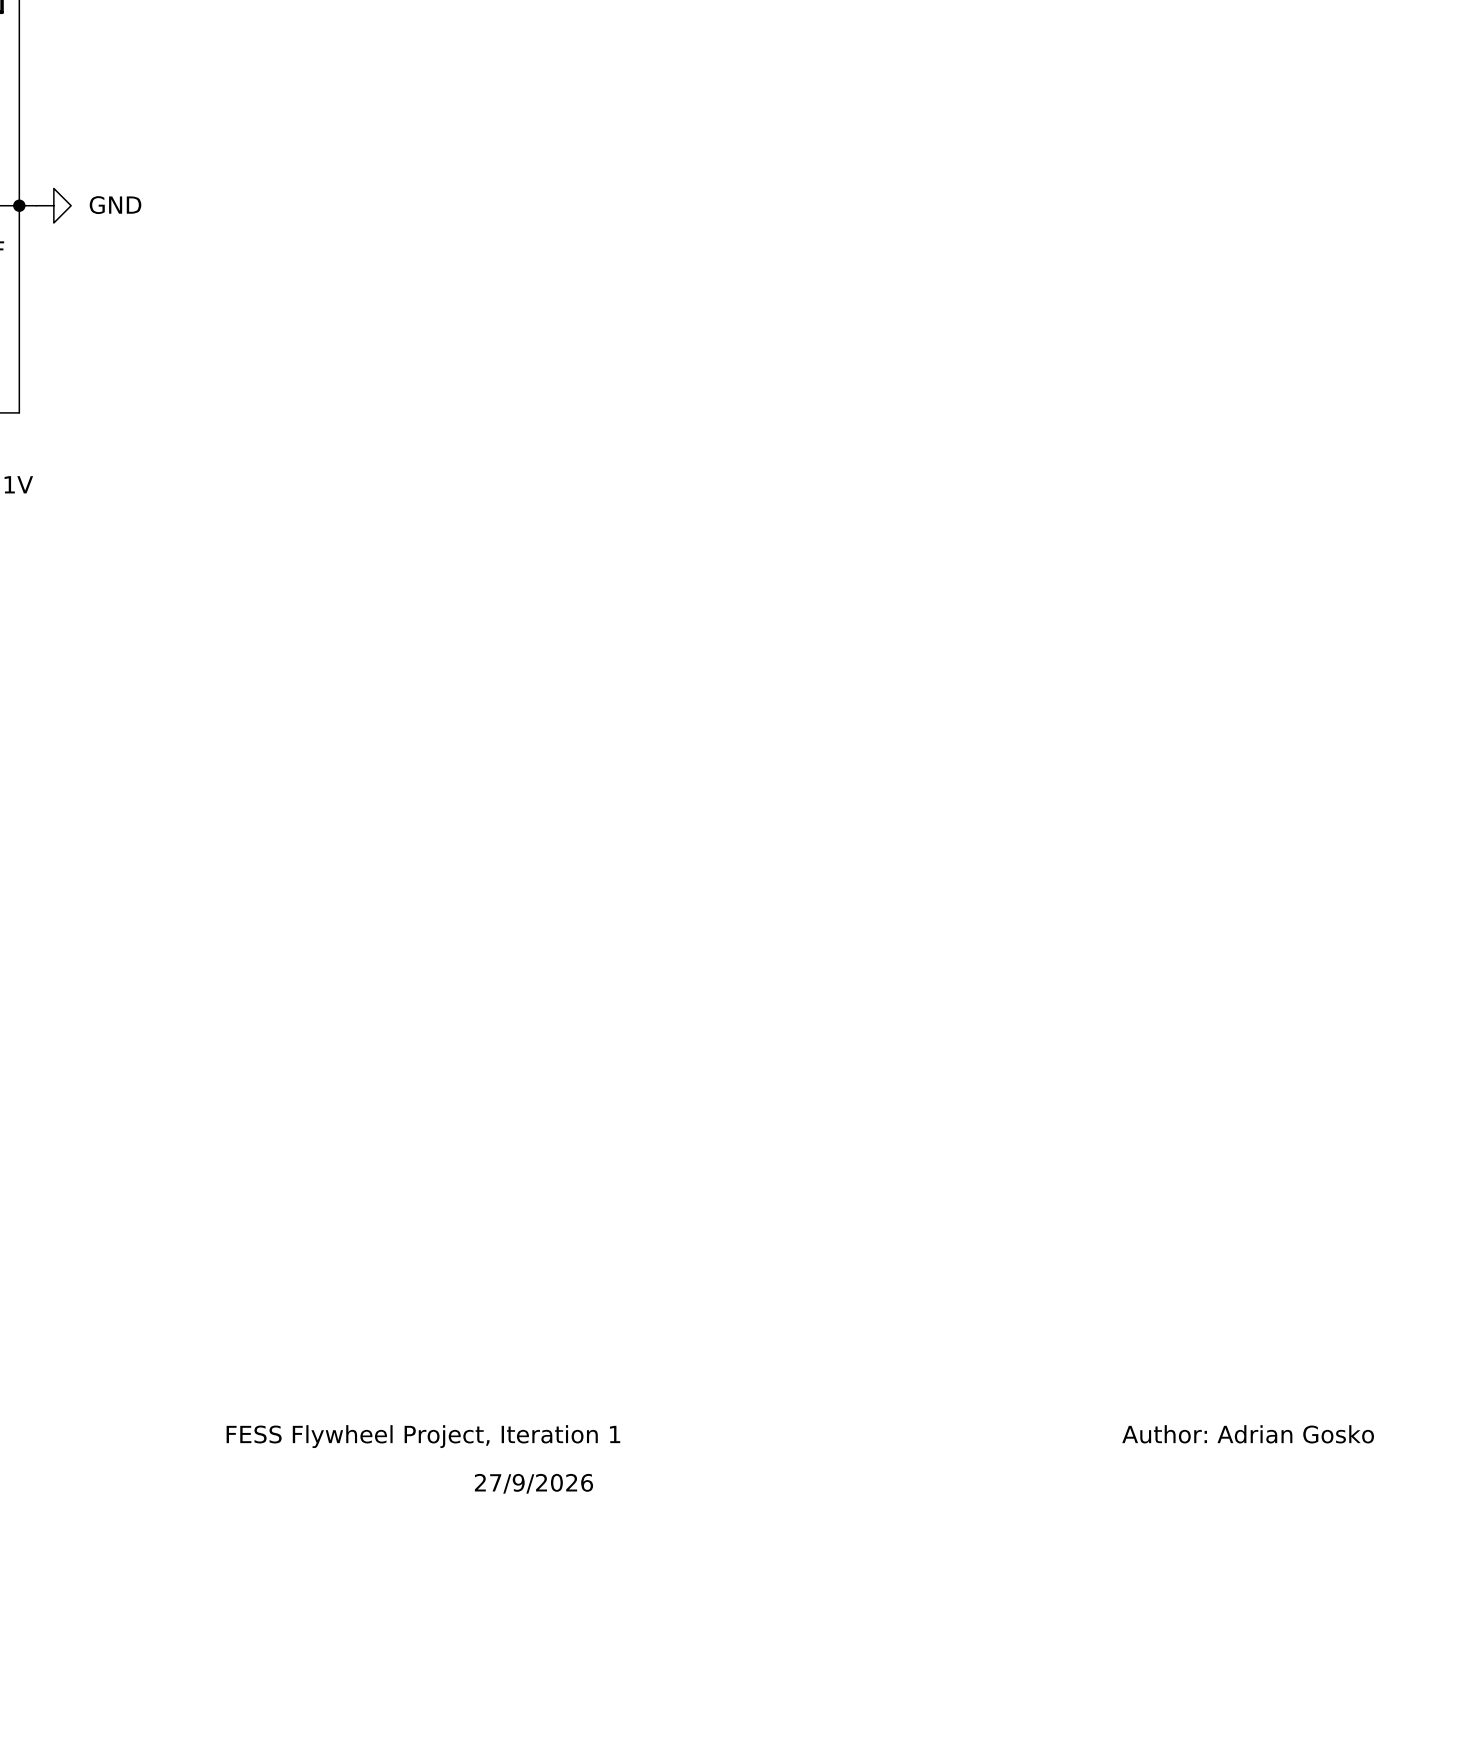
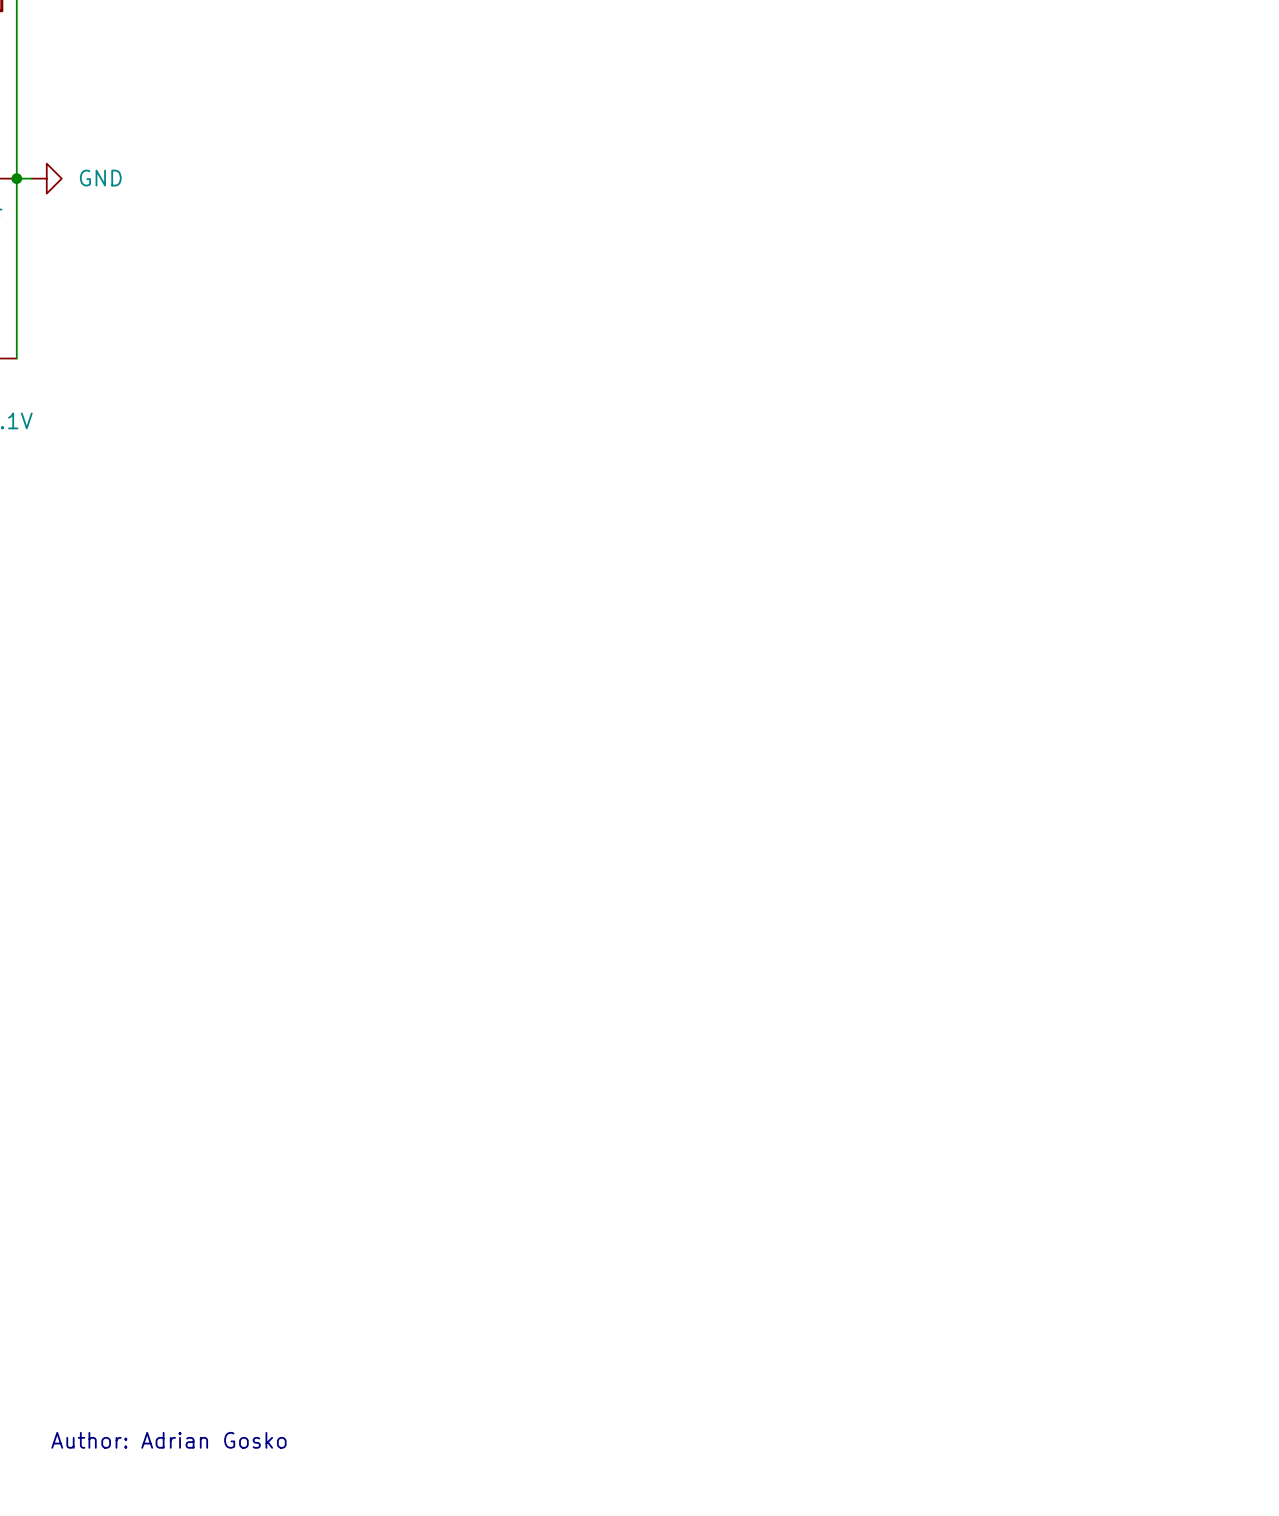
text: Author: Adrian Gosko (1248, 1434) -> none
text: FESS Flywheel Project, Iteration 1 (423, 1436) -> none
text: 27/9/2026 (533, 1483) -> none
text: none -> Author: Adrian Gosko (168, 1440)

